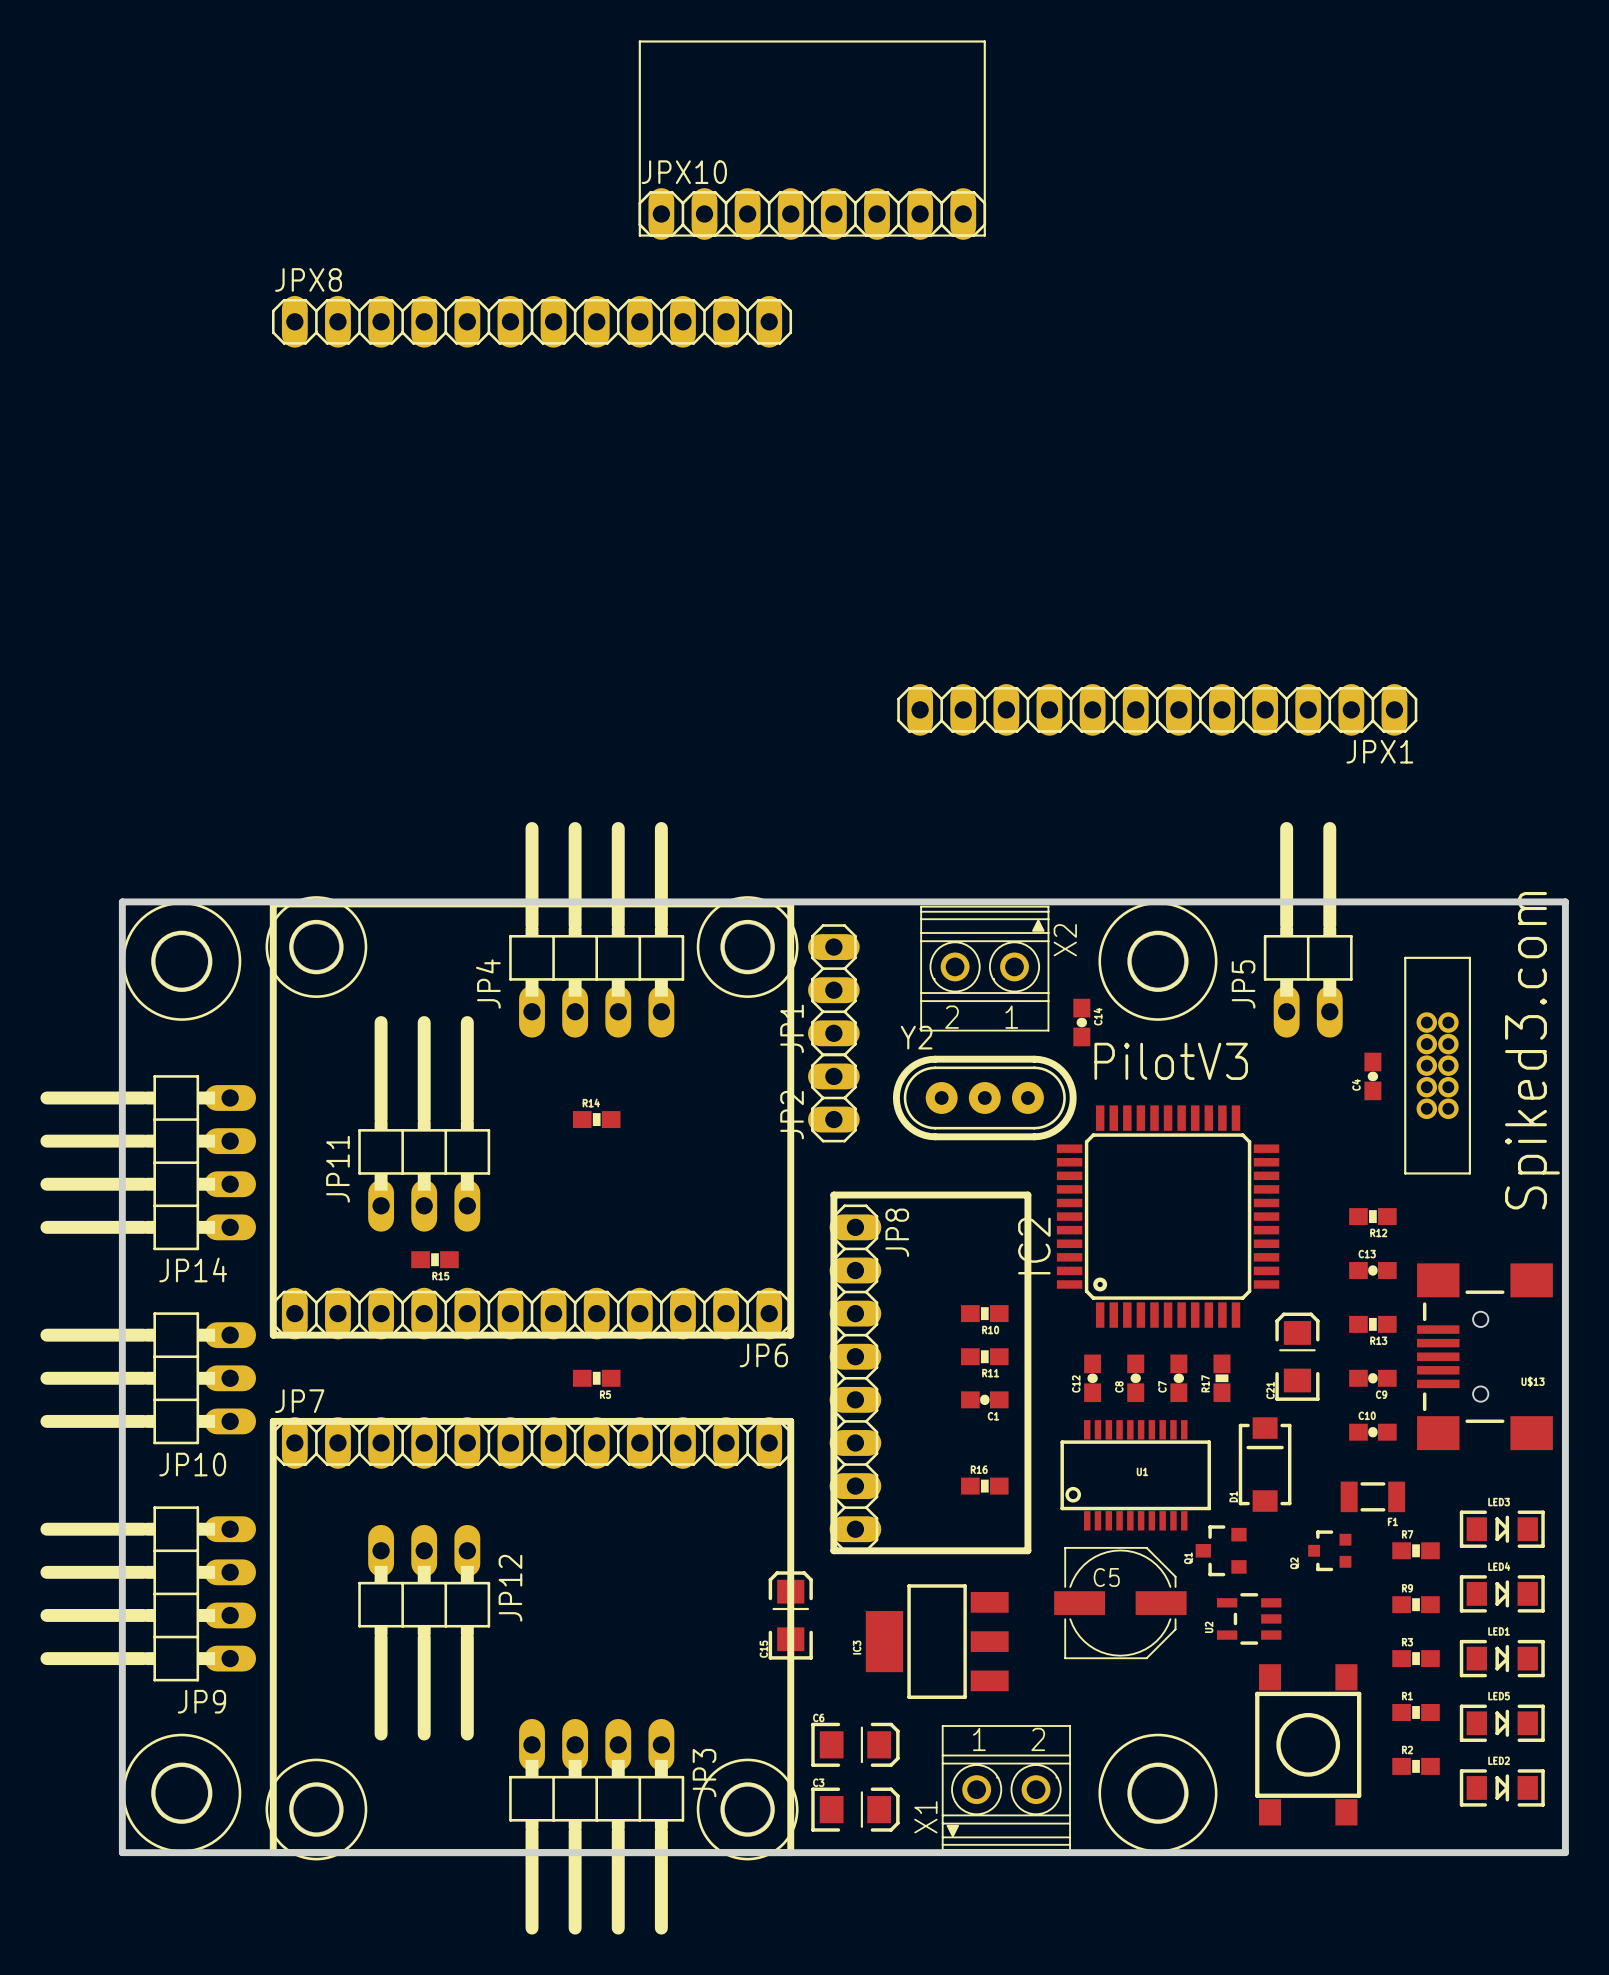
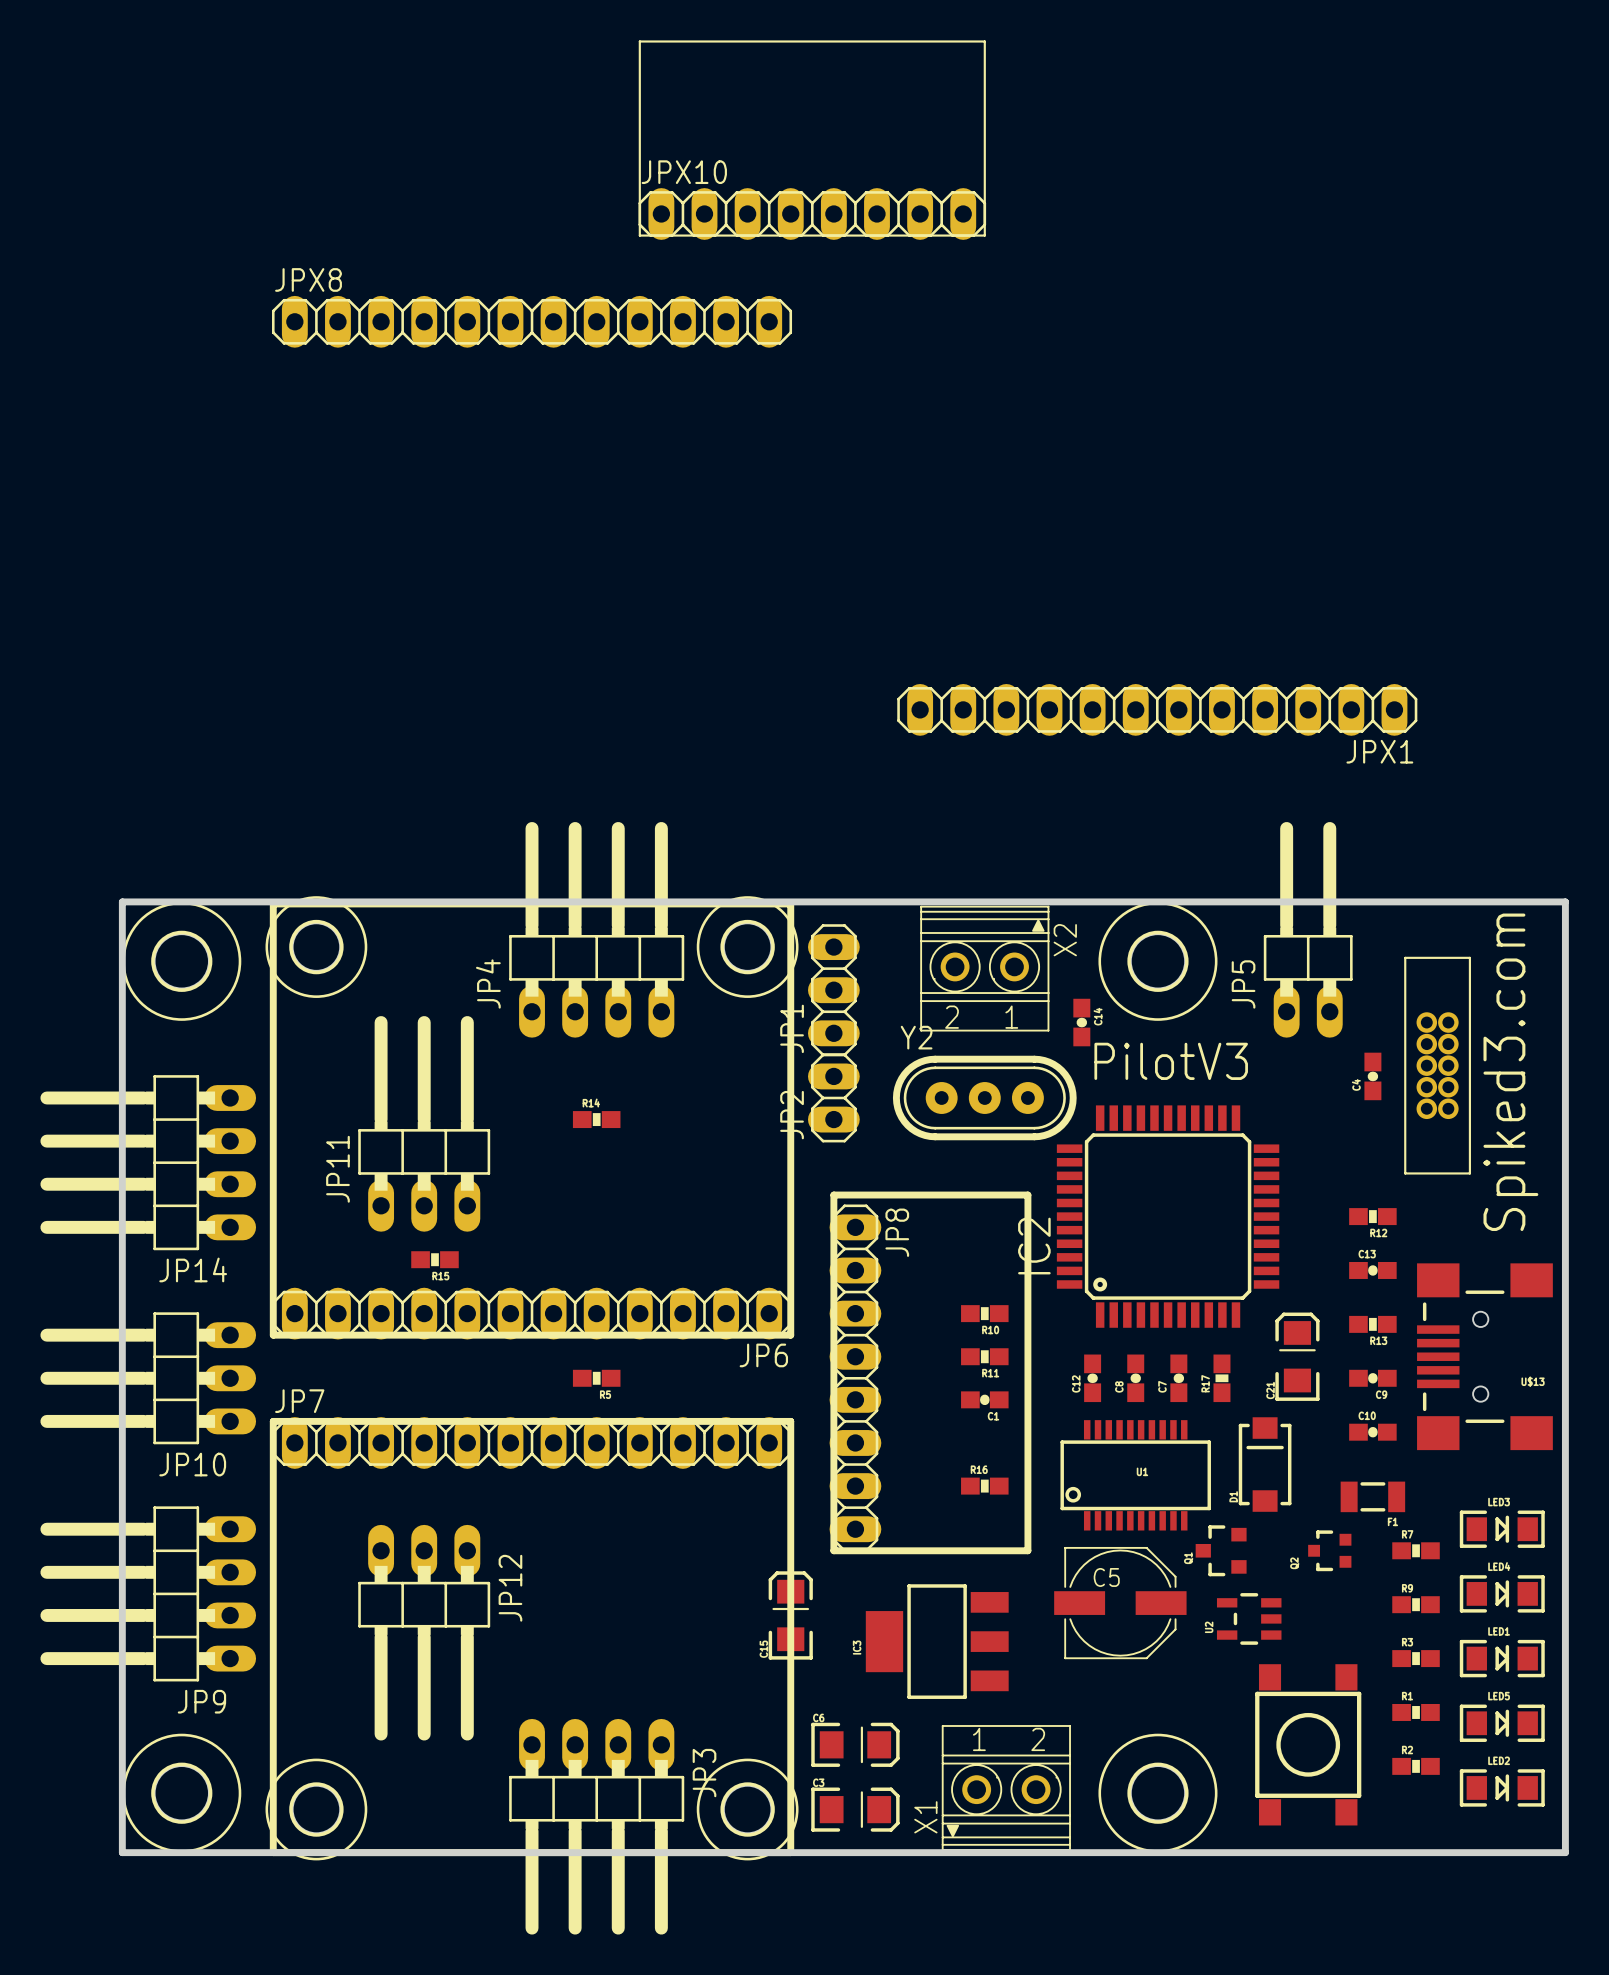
text position: Spiked3.com (1532, 1050) -> Spiked3.com (1510, 1072)

